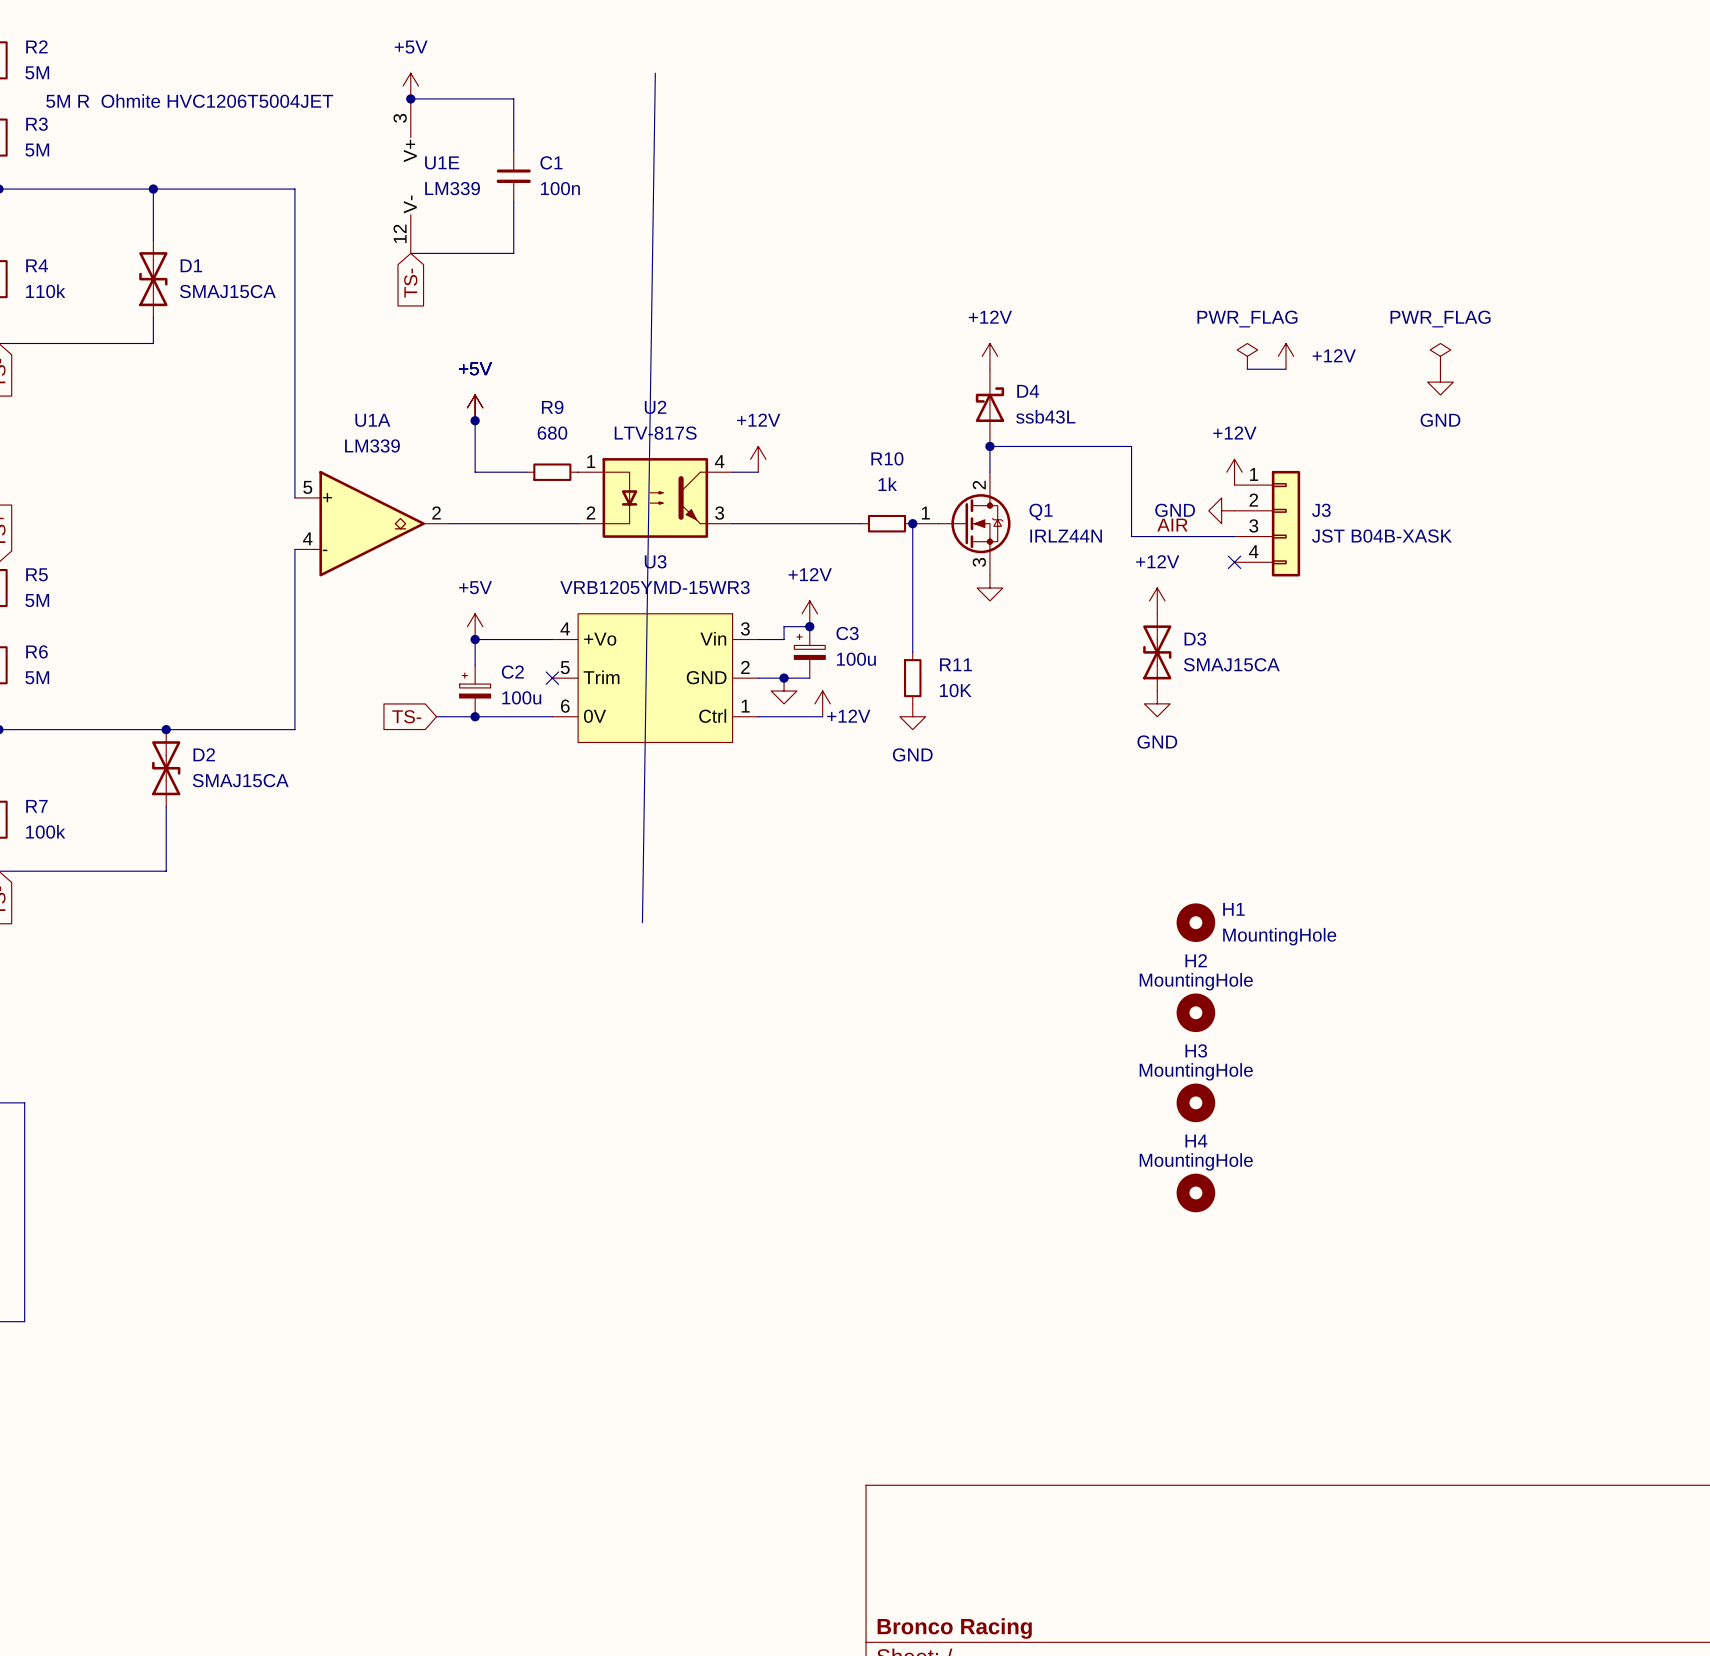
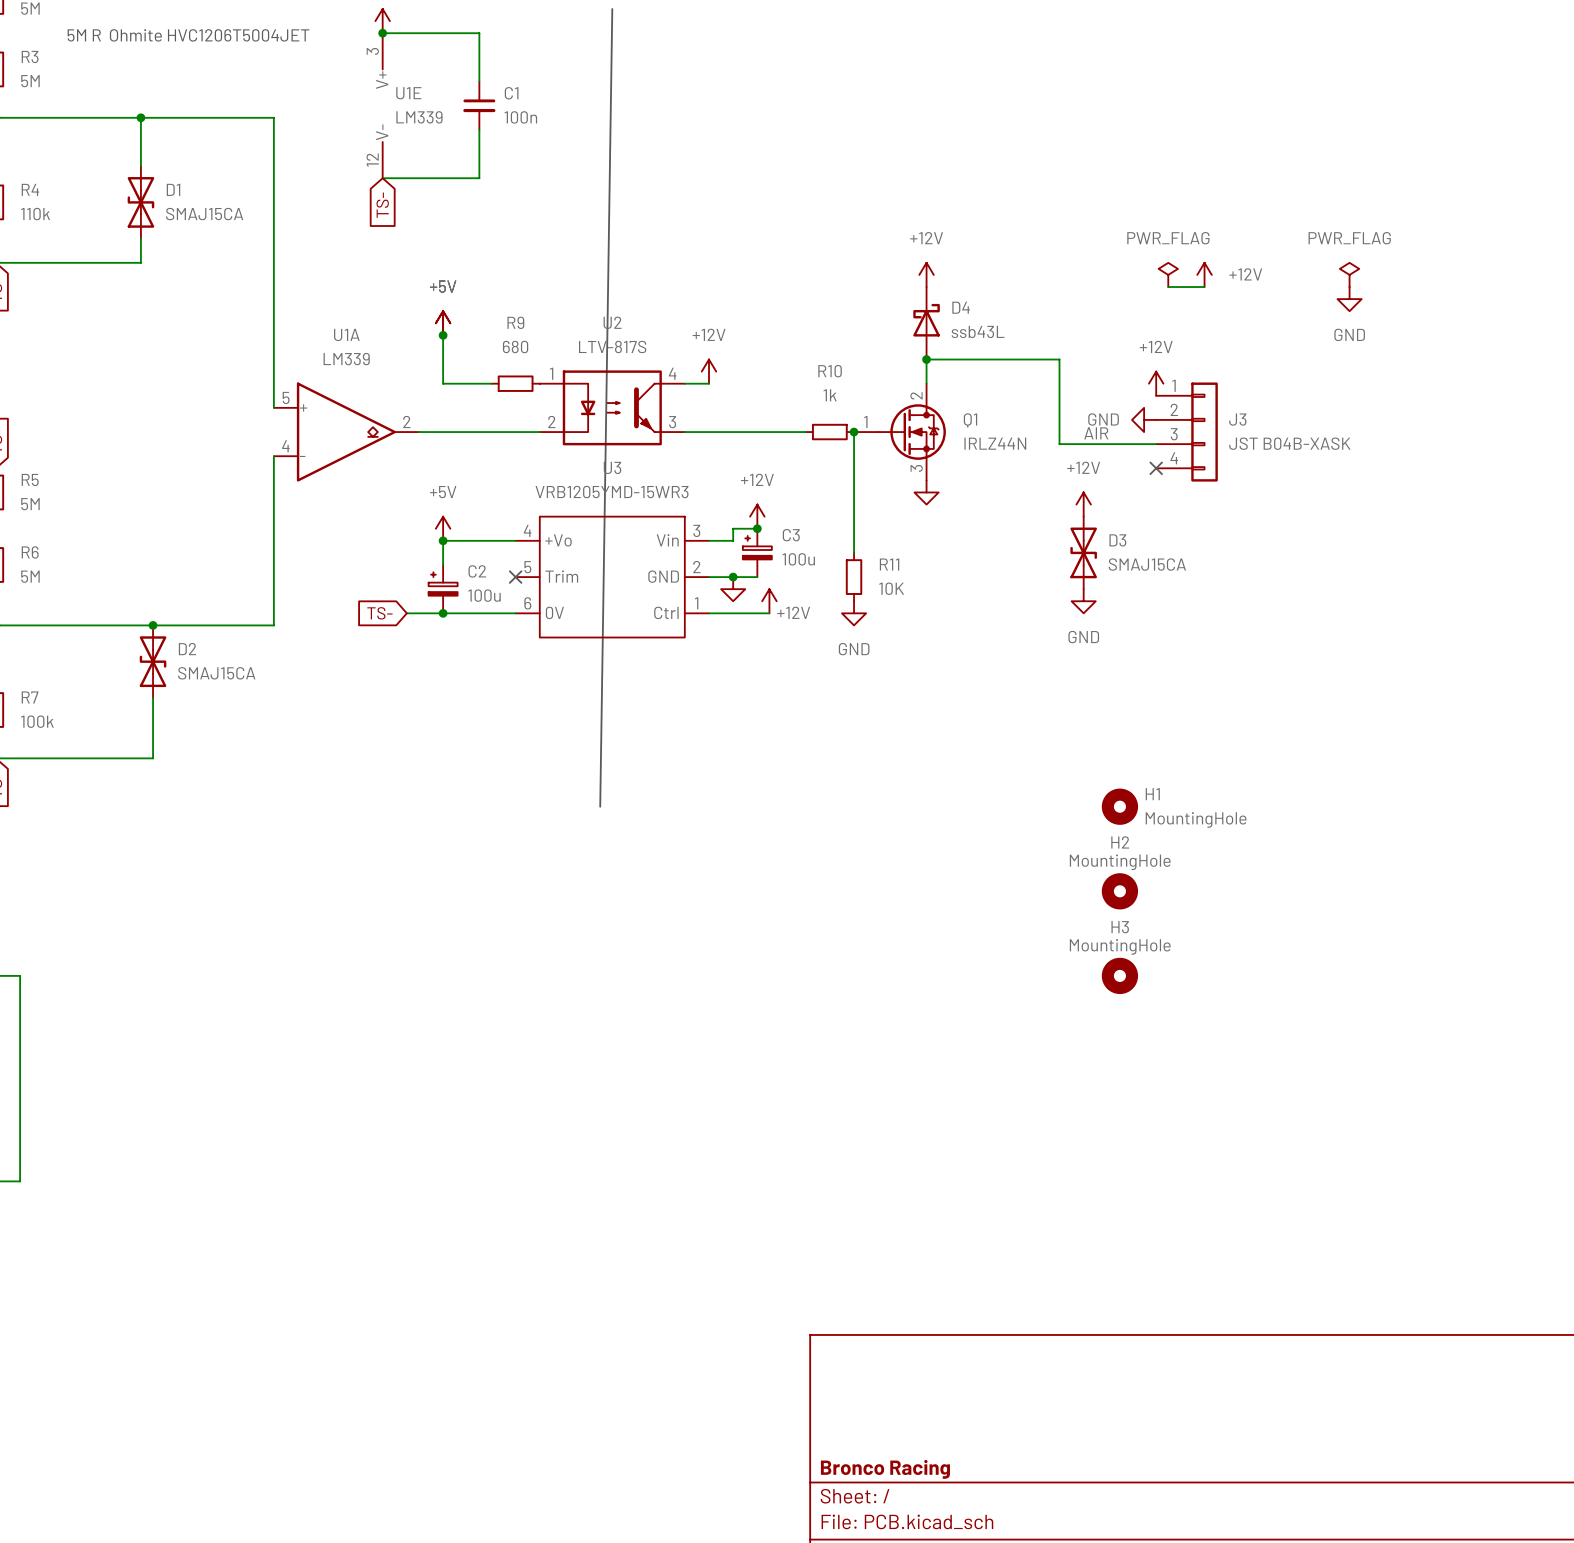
H4: MountingHole (1195, 1192) -> none

